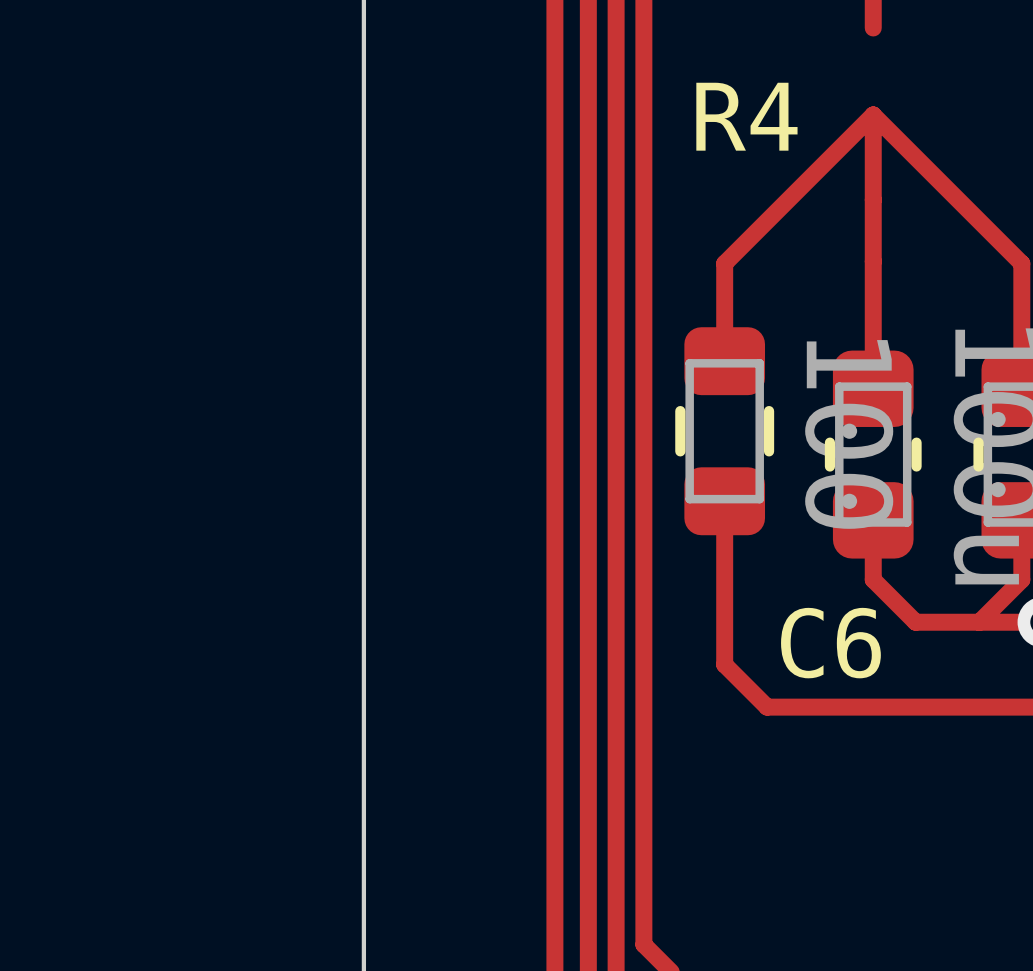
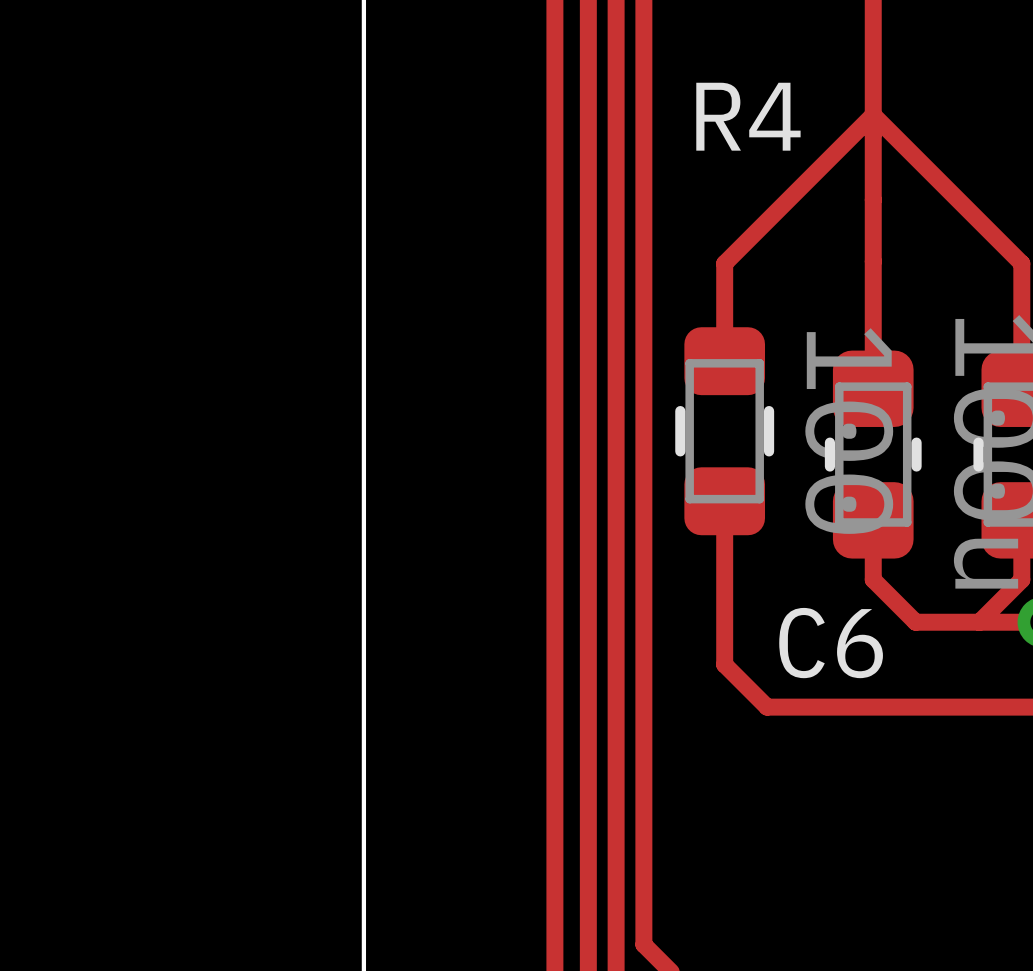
track: none -> (873, 27) (873, 115)

